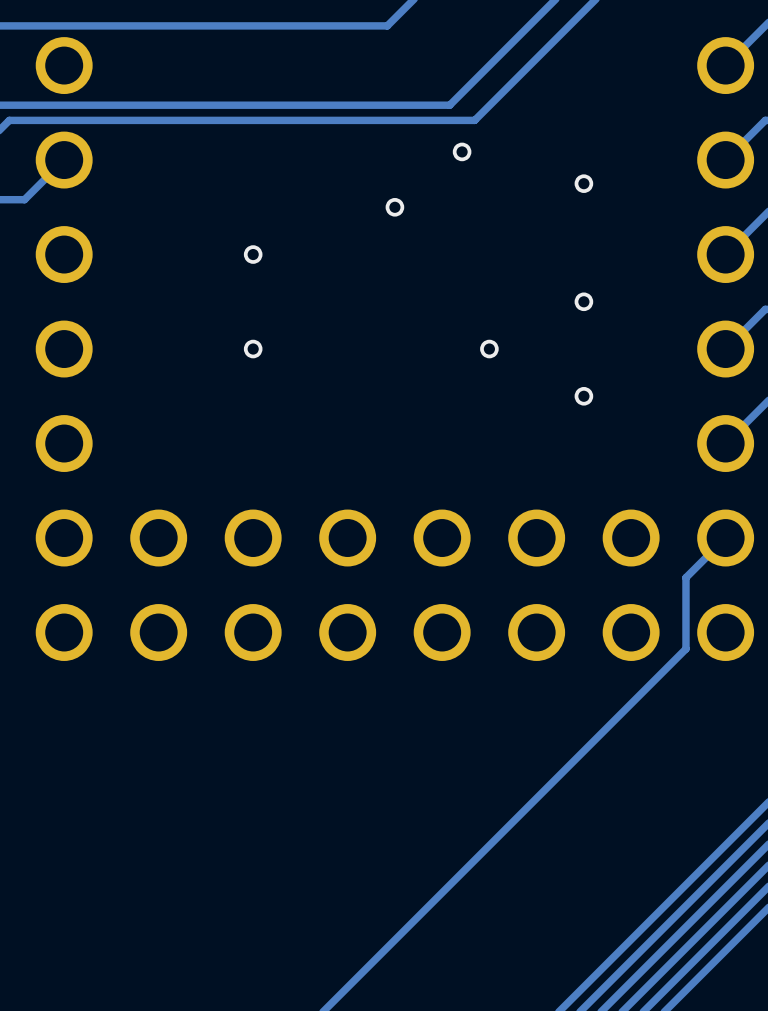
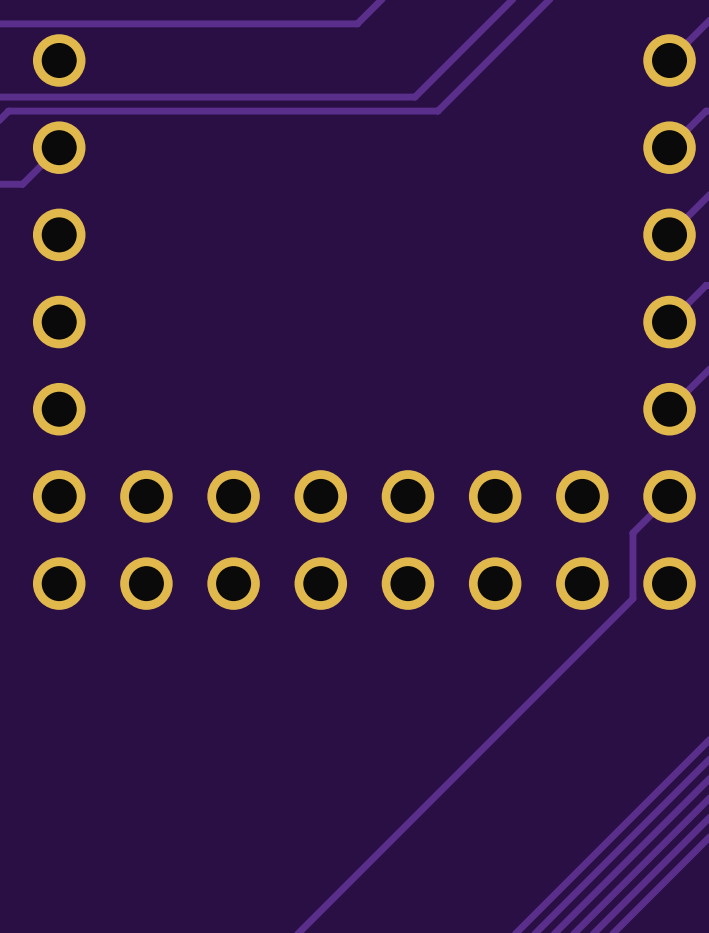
via: (462, 151) -> none
via: (583, 183) -> none
via: (394, 207) -> none
via: (253, 254) -> none
via: (583, 301) -> none
via: (253, 349) -> none
via: (489, 349) -> none
via: (583, 396) -> none

